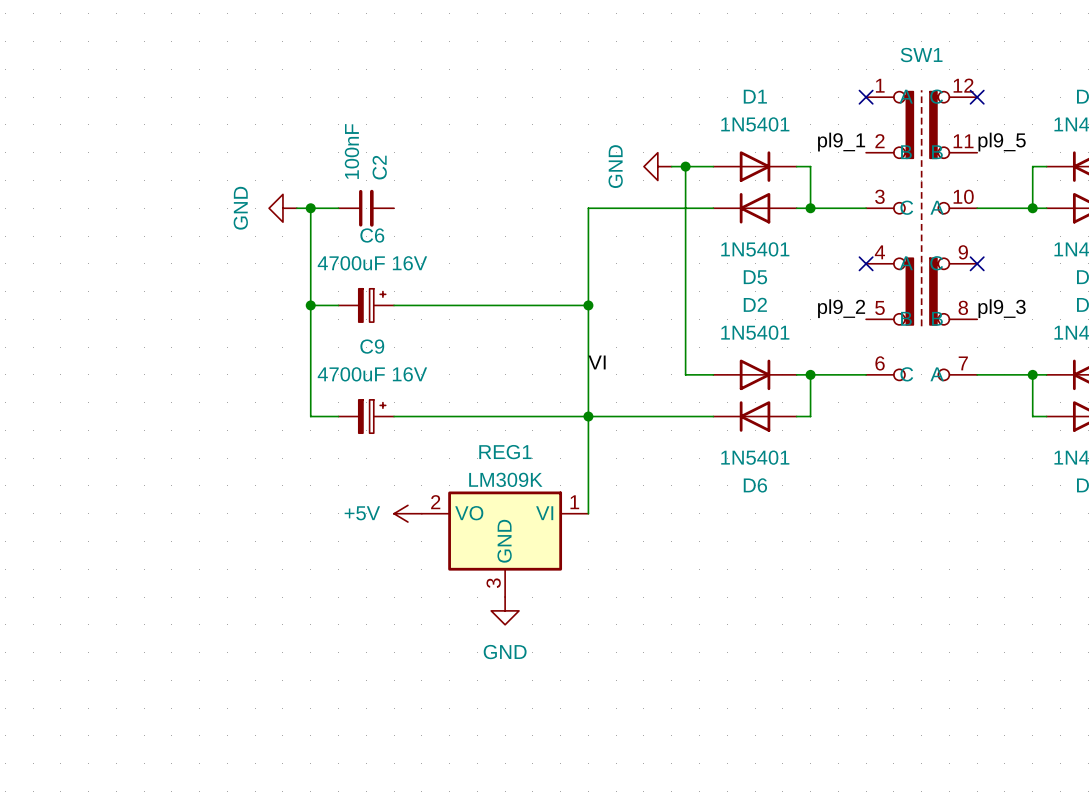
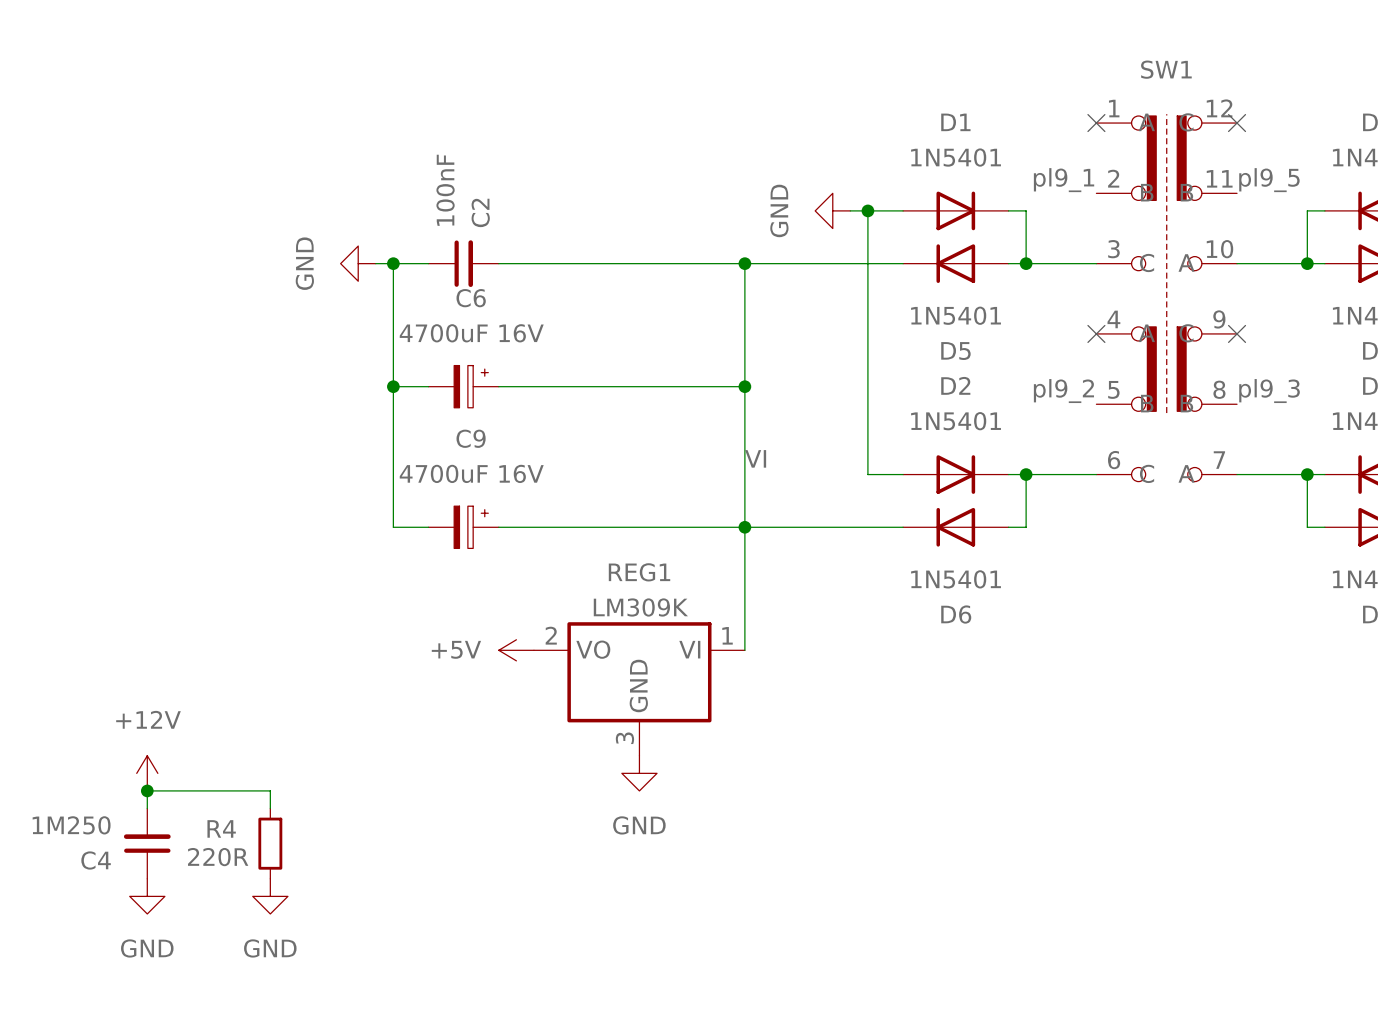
wire: none -> (498, 263) (744, 263)
junction: none -> (744, 263)
power symbol: none -> +12V (147, 773)
junction: none -> (147, 790)
wire: none -> (147, 808) (147, 790) (270, 790) (270, 808)
C4: none -> 1M250 (147, 843)
R4: none -> 220R (270, 843)
power symbol: none -> GND (147, 896)
power symbol: none -> GND (270, 896)

